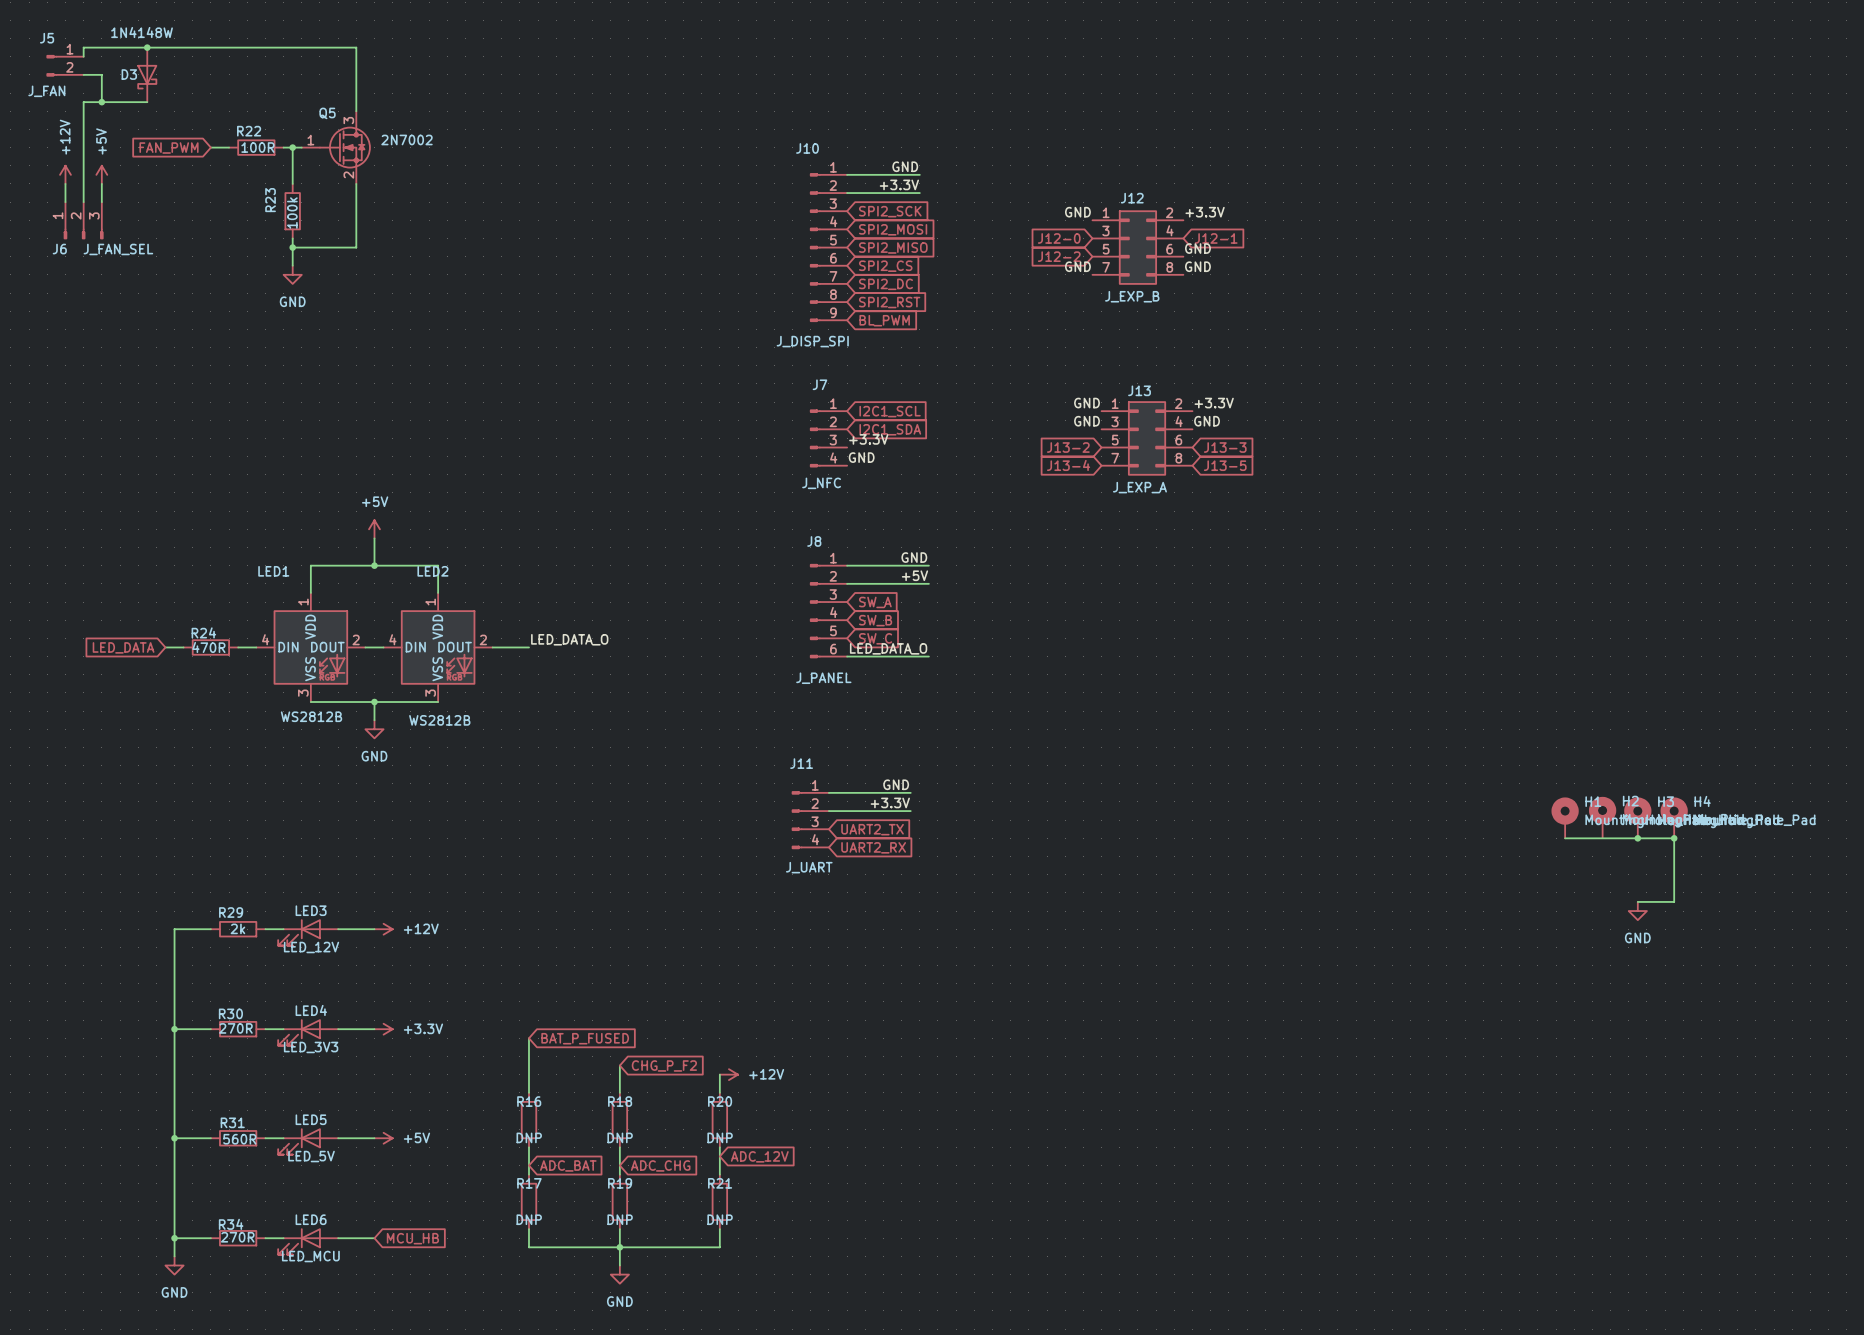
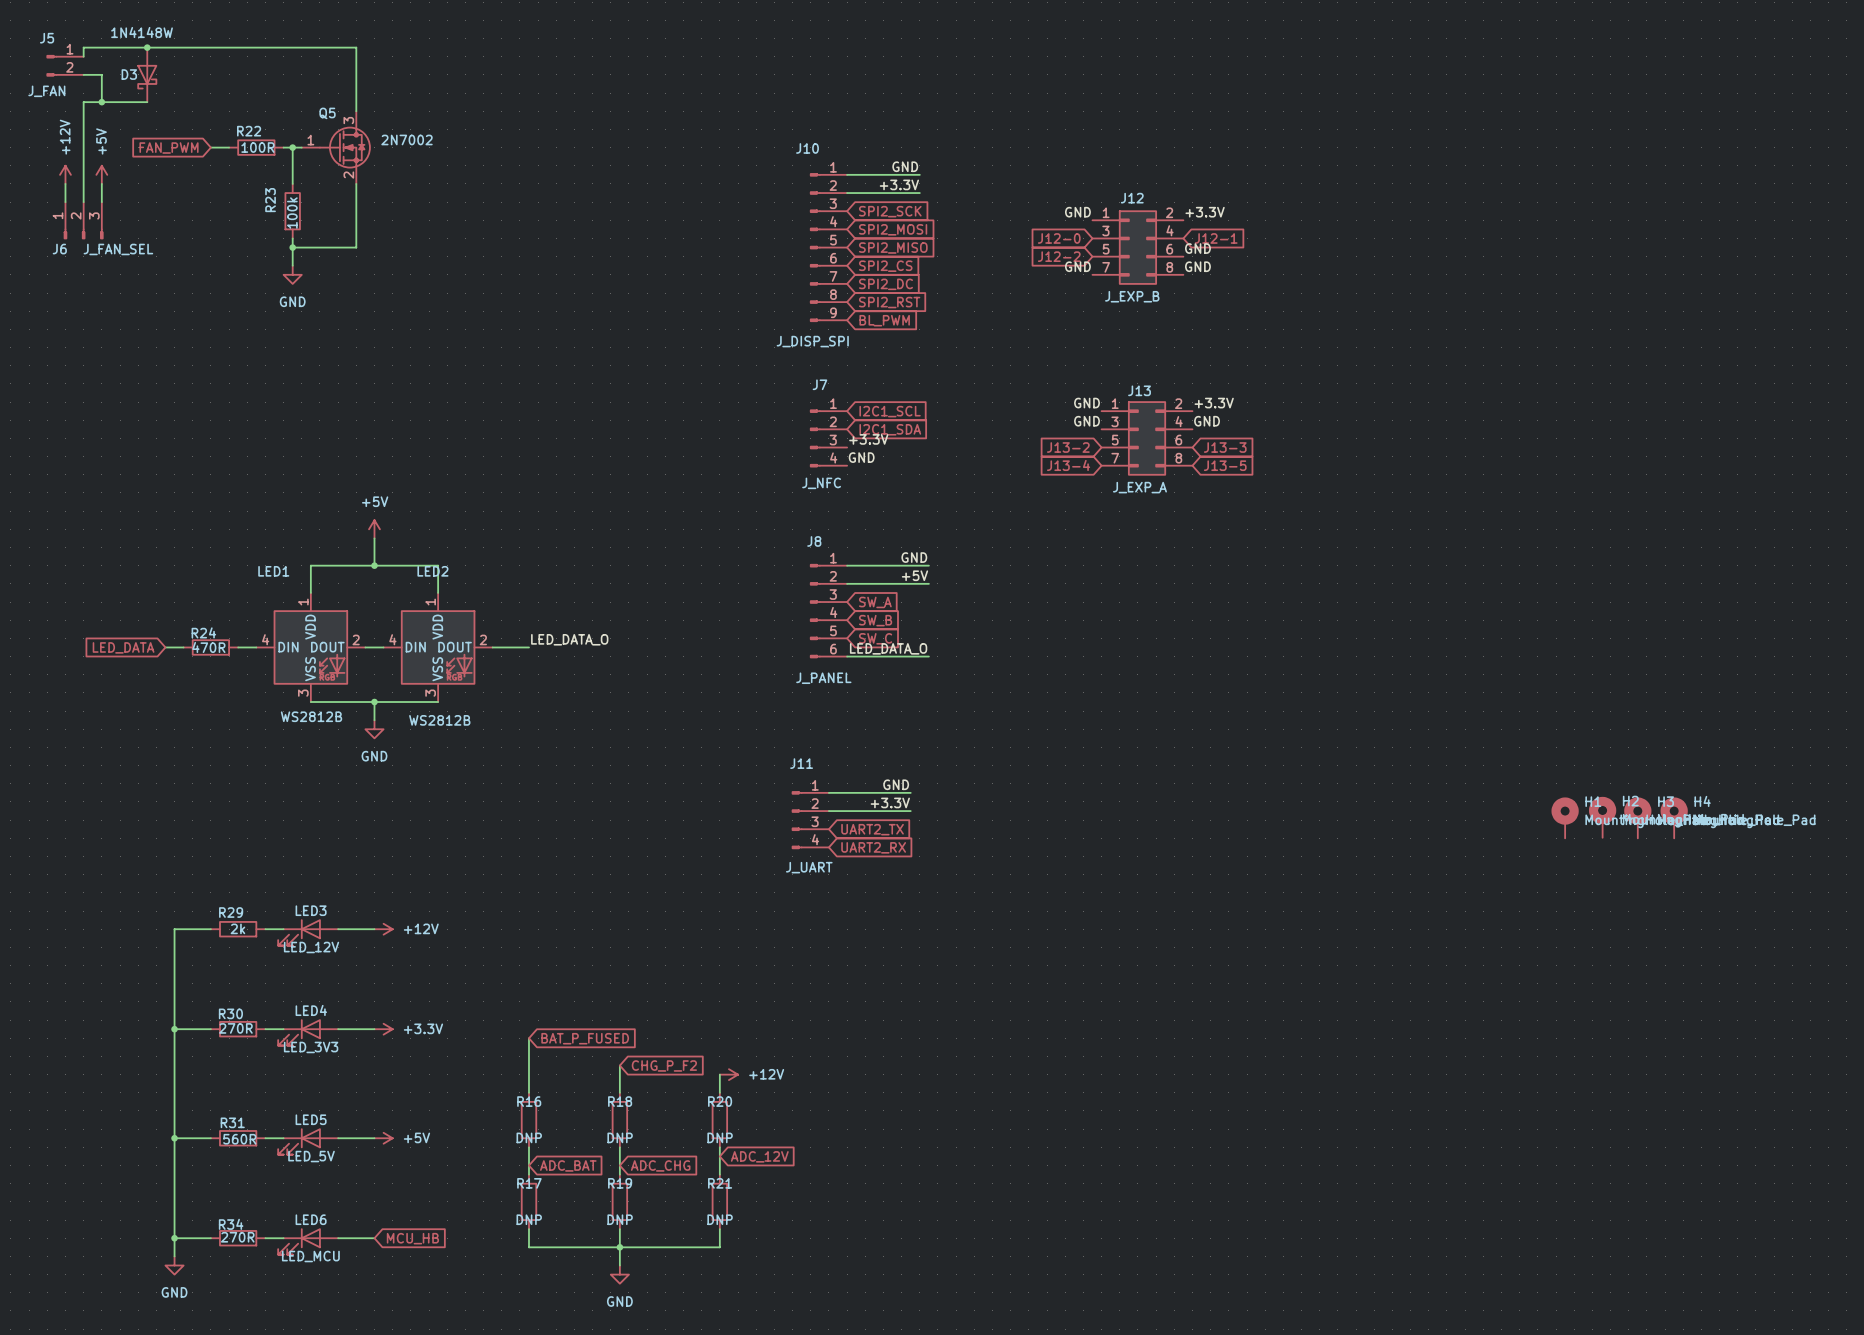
wire: (1565, 838) (1674, 838) (1674, 901) (1637, 901) -> none
junction: (1637, 838) -> none
junction: (1674, 838) -> none
power symbol: GND (1637, 911) -> none

